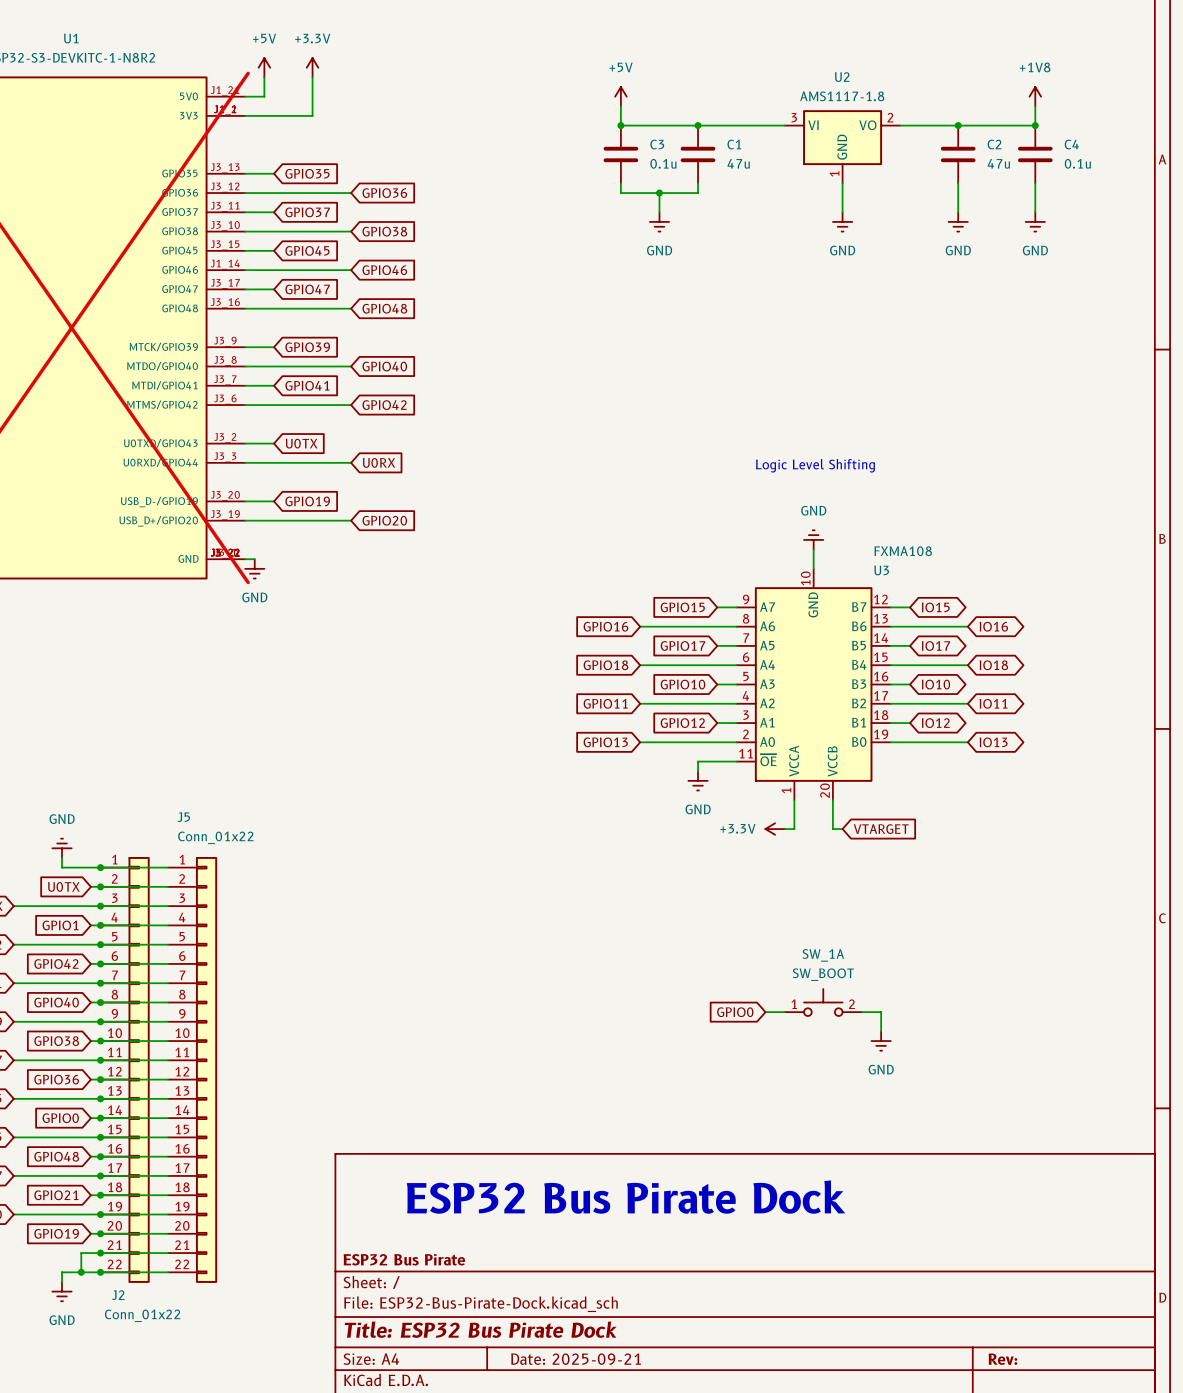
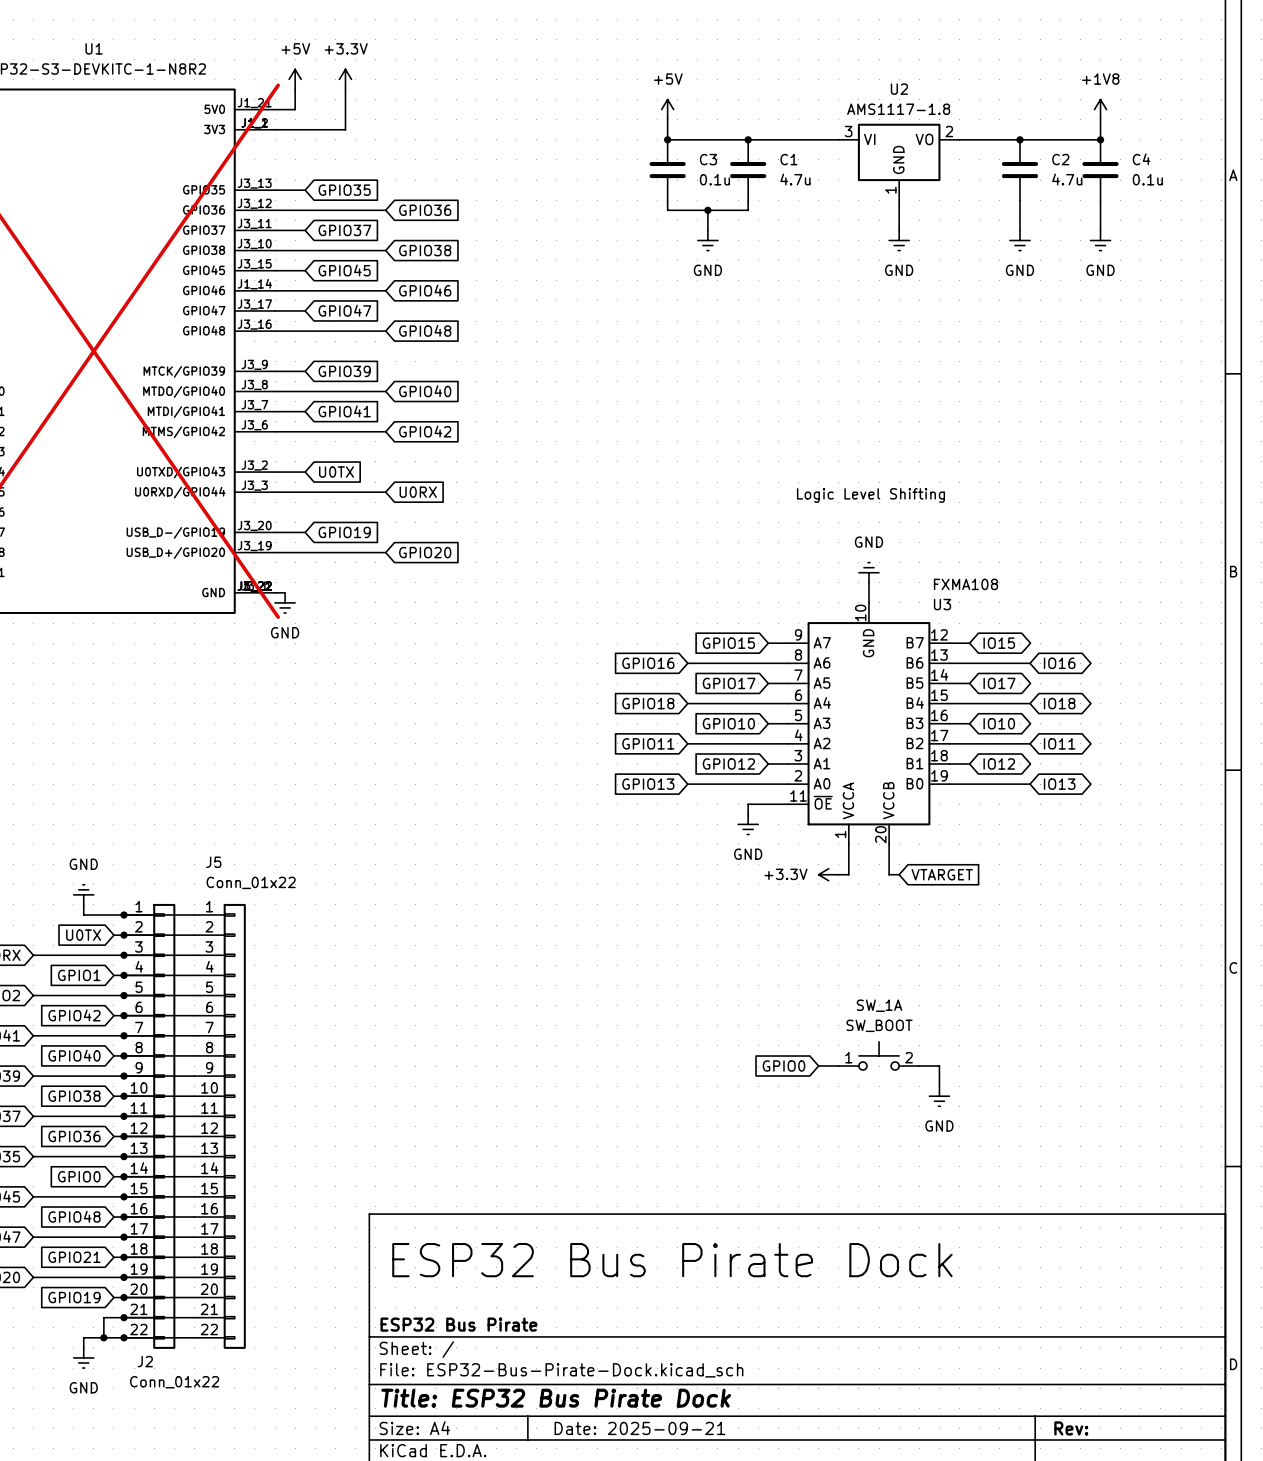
C1 value: 47u (738, 163) -> 4.7u (795, 179)
C2 value: 47u (998, 163) -> 4.7u (1067, 179)

